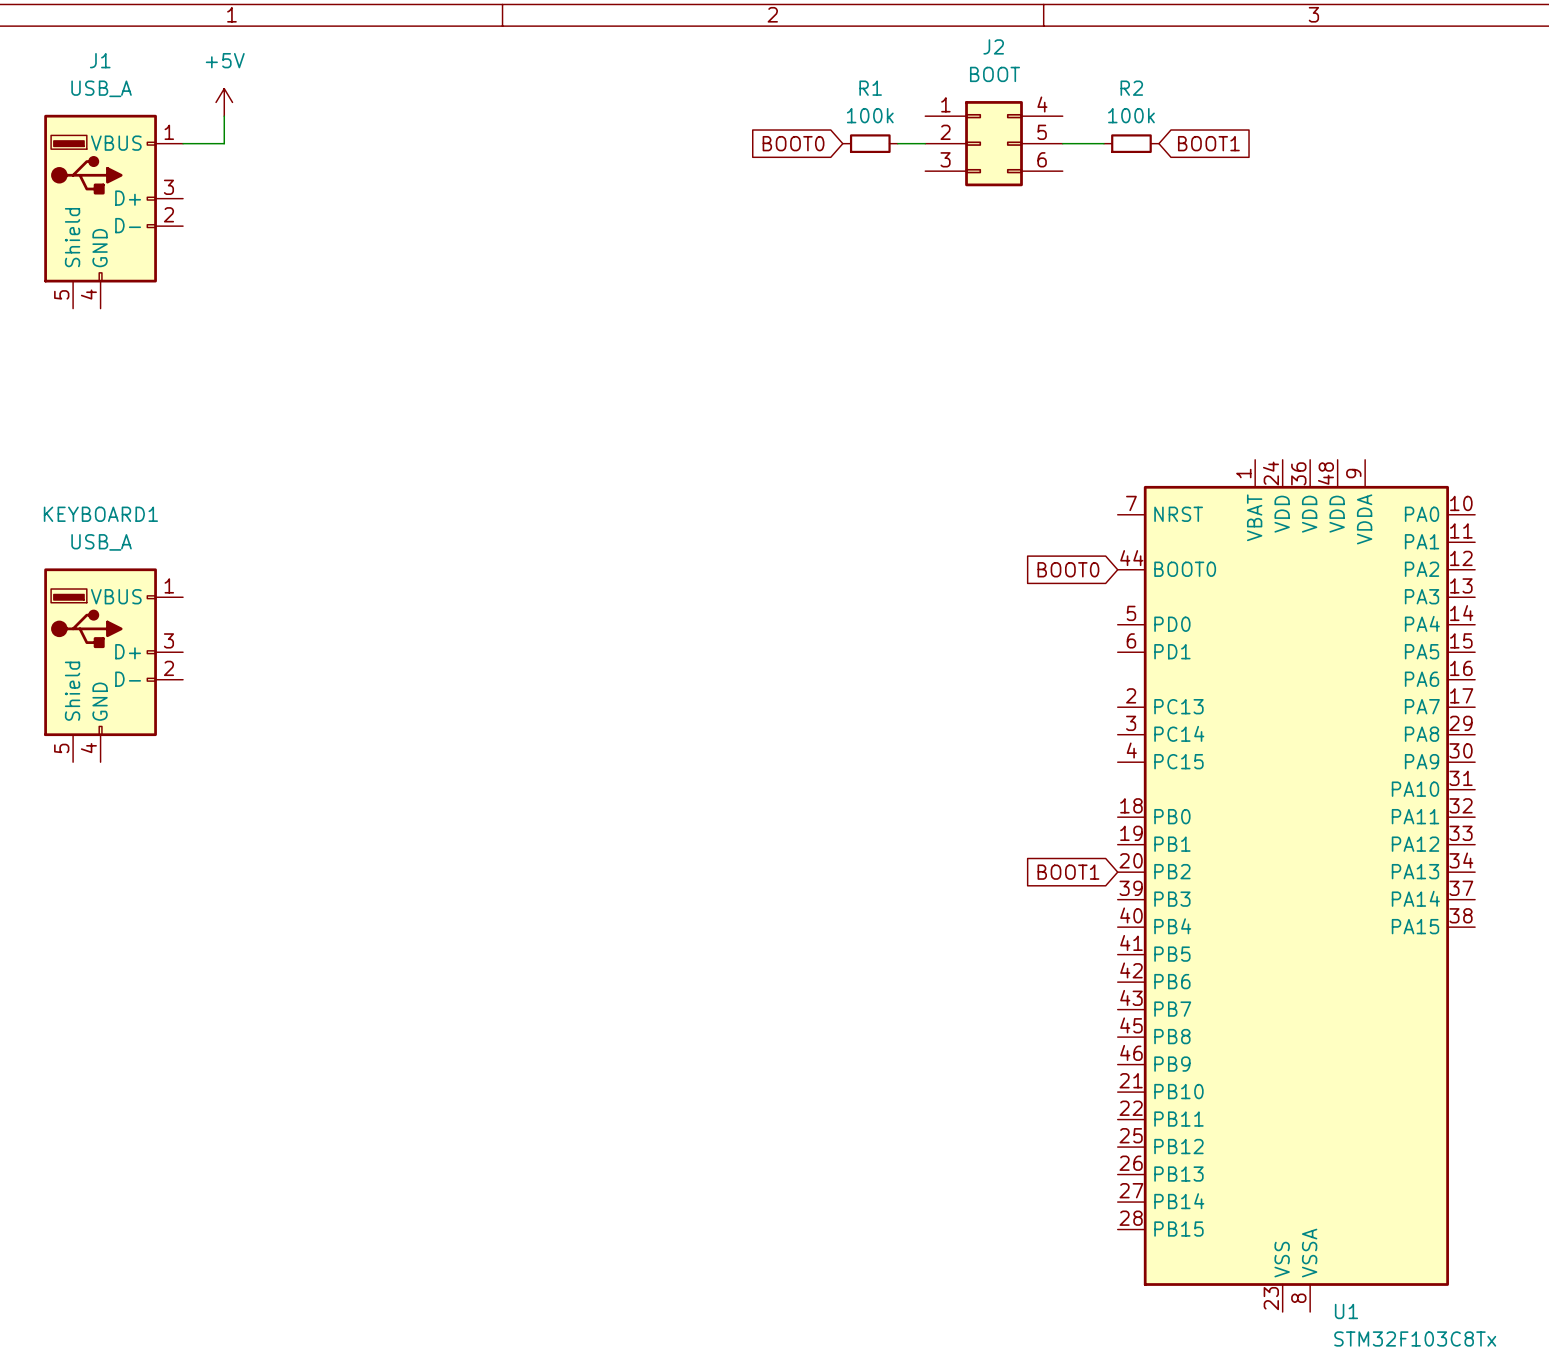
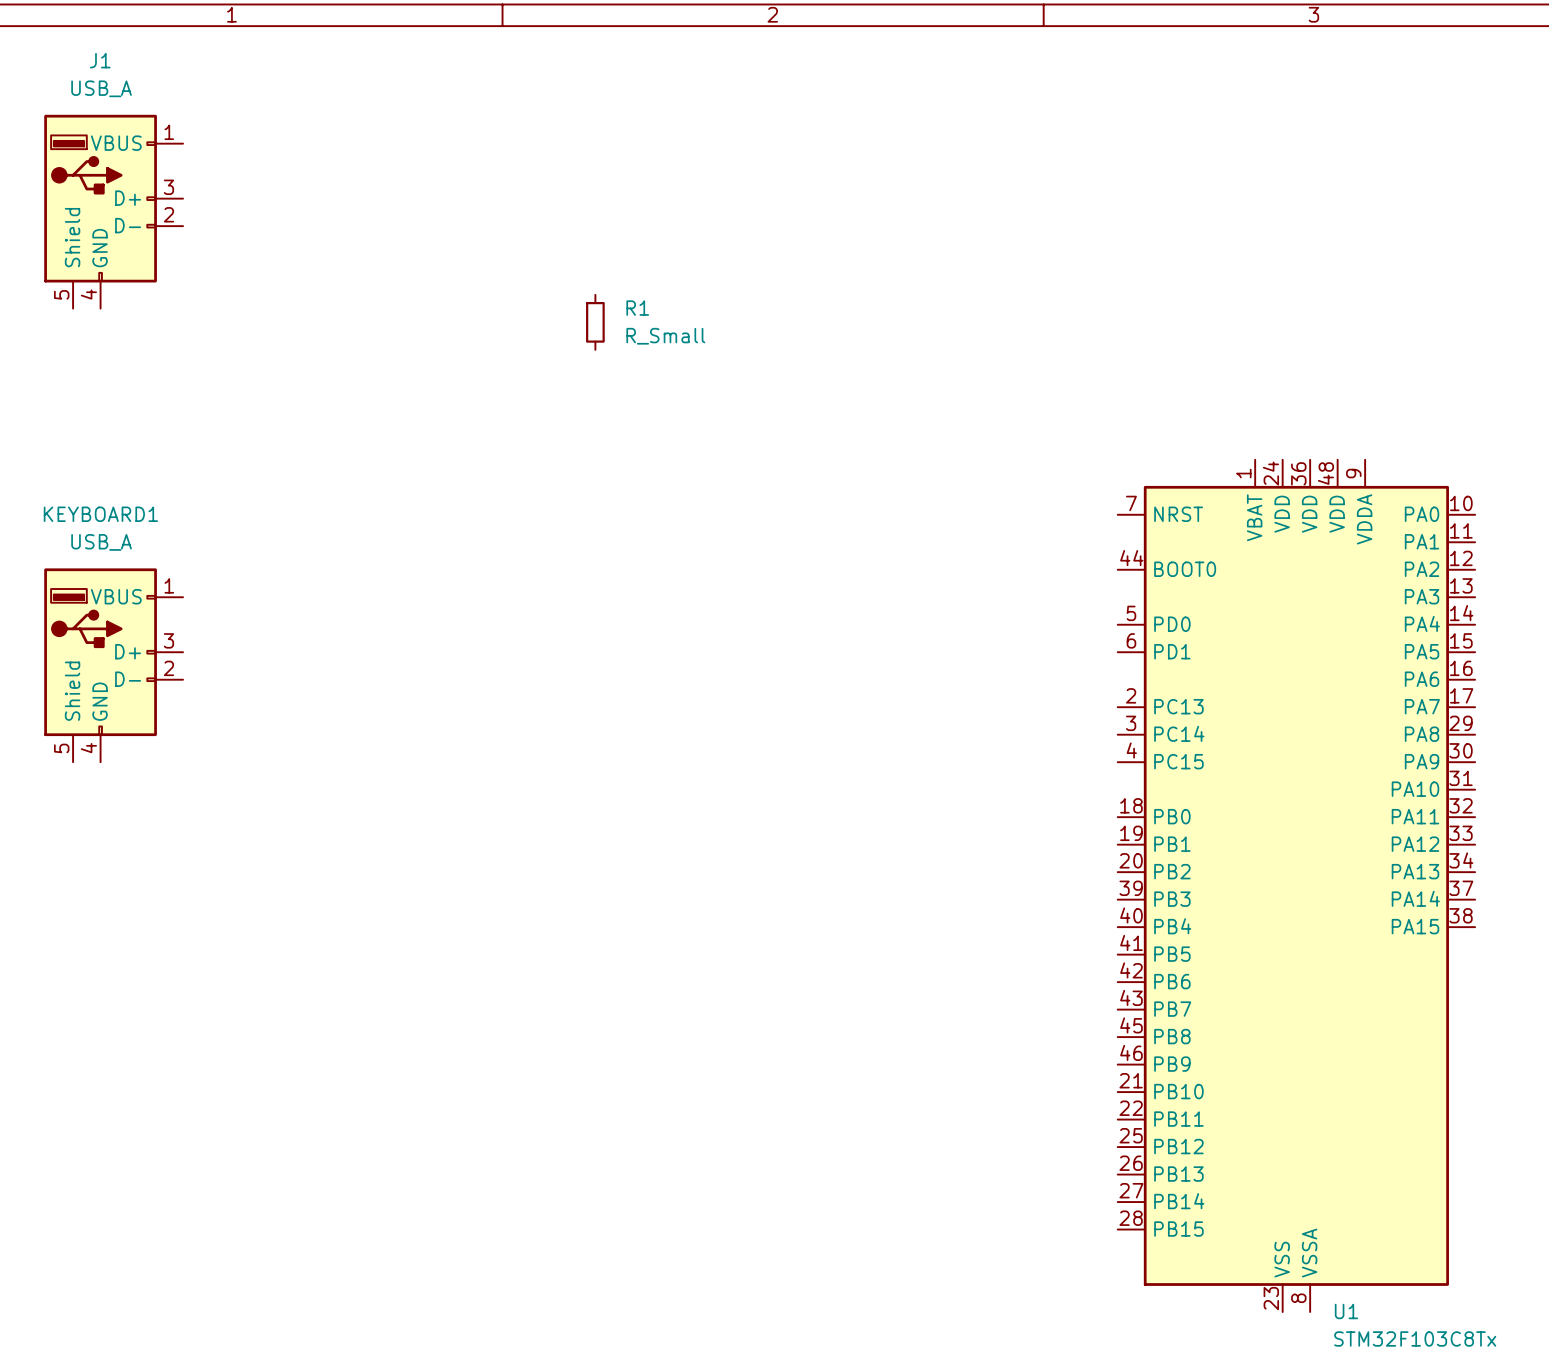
power symbol: +5V (224, 102) -> none
R1 value: 100k (870, 115) -> R_Small (665, 336)
wire: (224, 116) (224, 143) (183, 143) -> none
global label: BOOT0 (793, 143) -> none
R1 rotation: 0° (870, 143) -> 90° clockwise (595, 322)
R1 position: (870, 143) -> (595, 322)
wire: (897, 143) (925, 143) -> none
J2: BOOT (994, 143) -> none
wire: (1062, 143) (1103, 143) -> none
R2: 100k (1131, 143) -> none
global label: BOOT1 (1208, 143) -> none
global label: BOOT0 (1068, 569) -> none
global label: BOOT1 (1068, 872) -> none

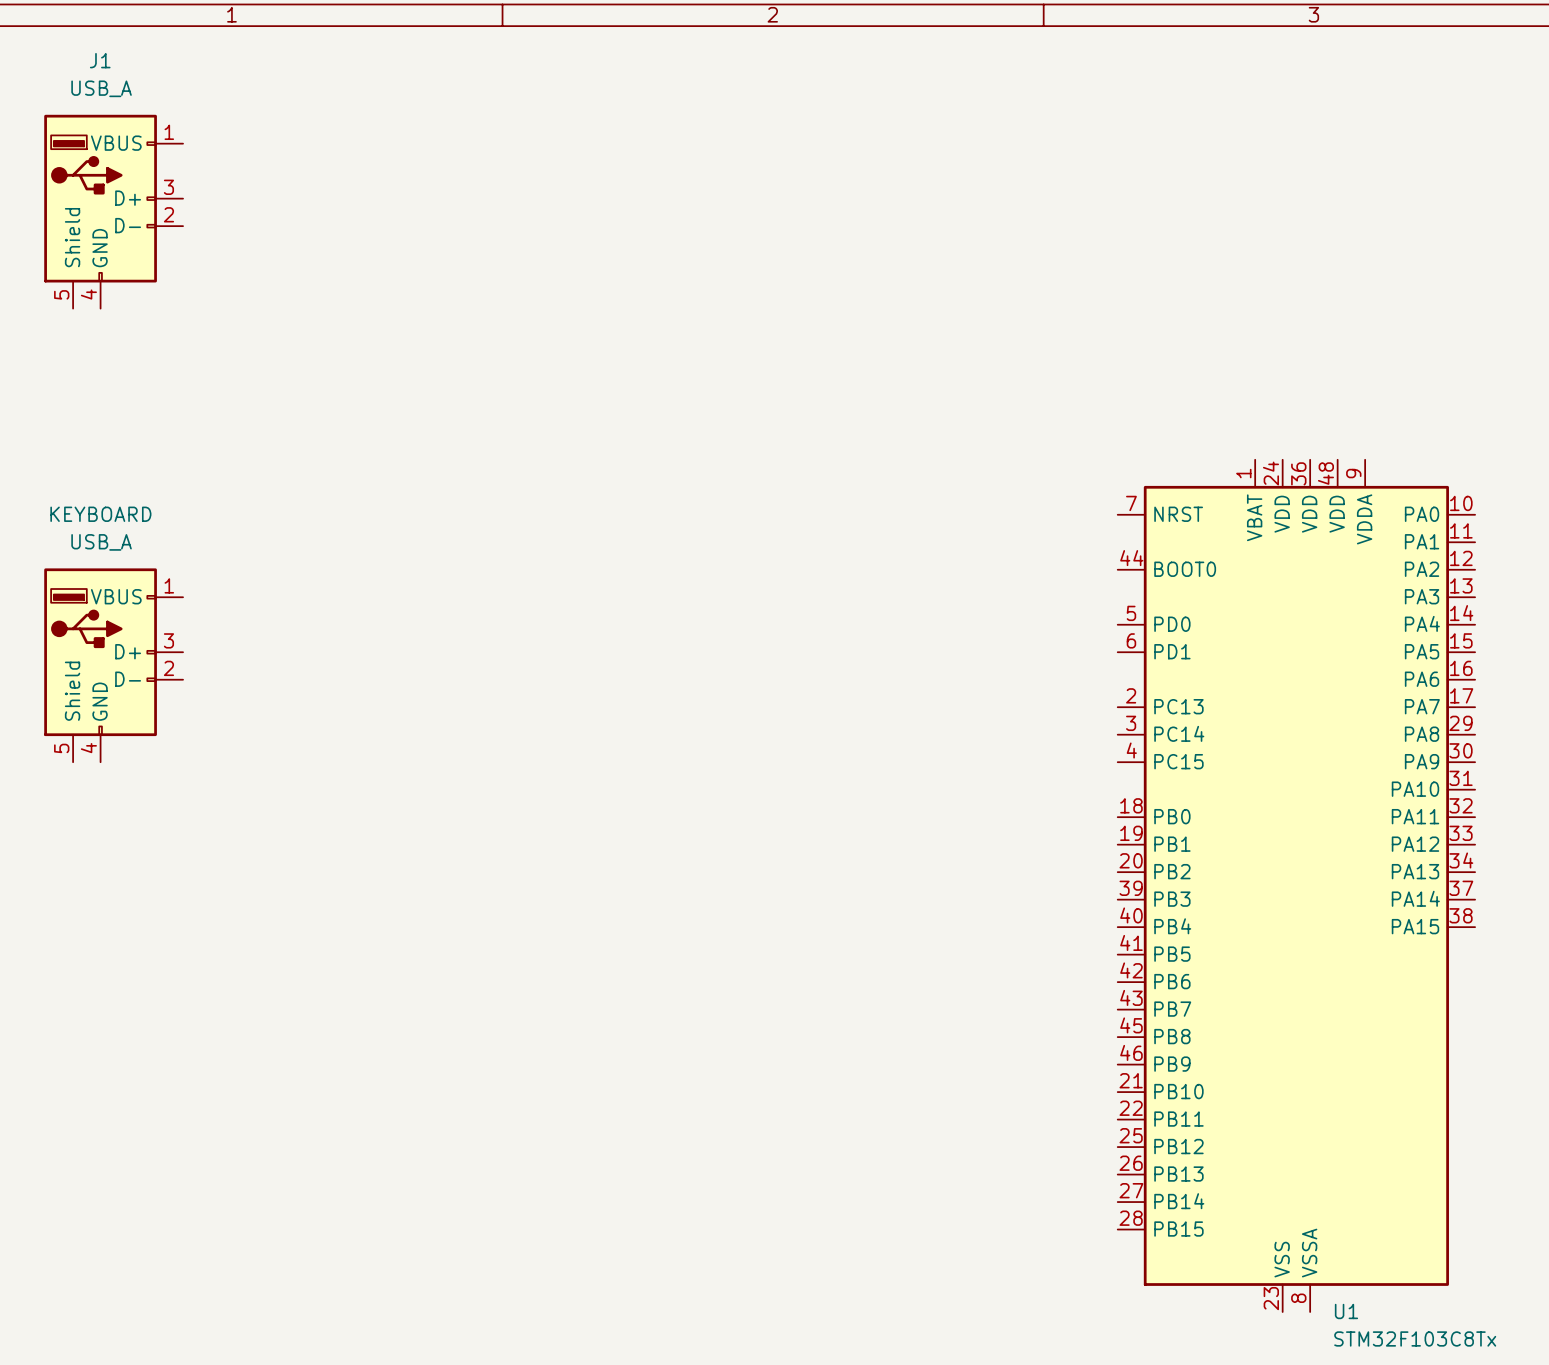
R1: R_Small (595, 322) -> none
KEYBOARD1 name: KEYBOARD1 (100, 514) -> KEYBOARD (100, 514)

